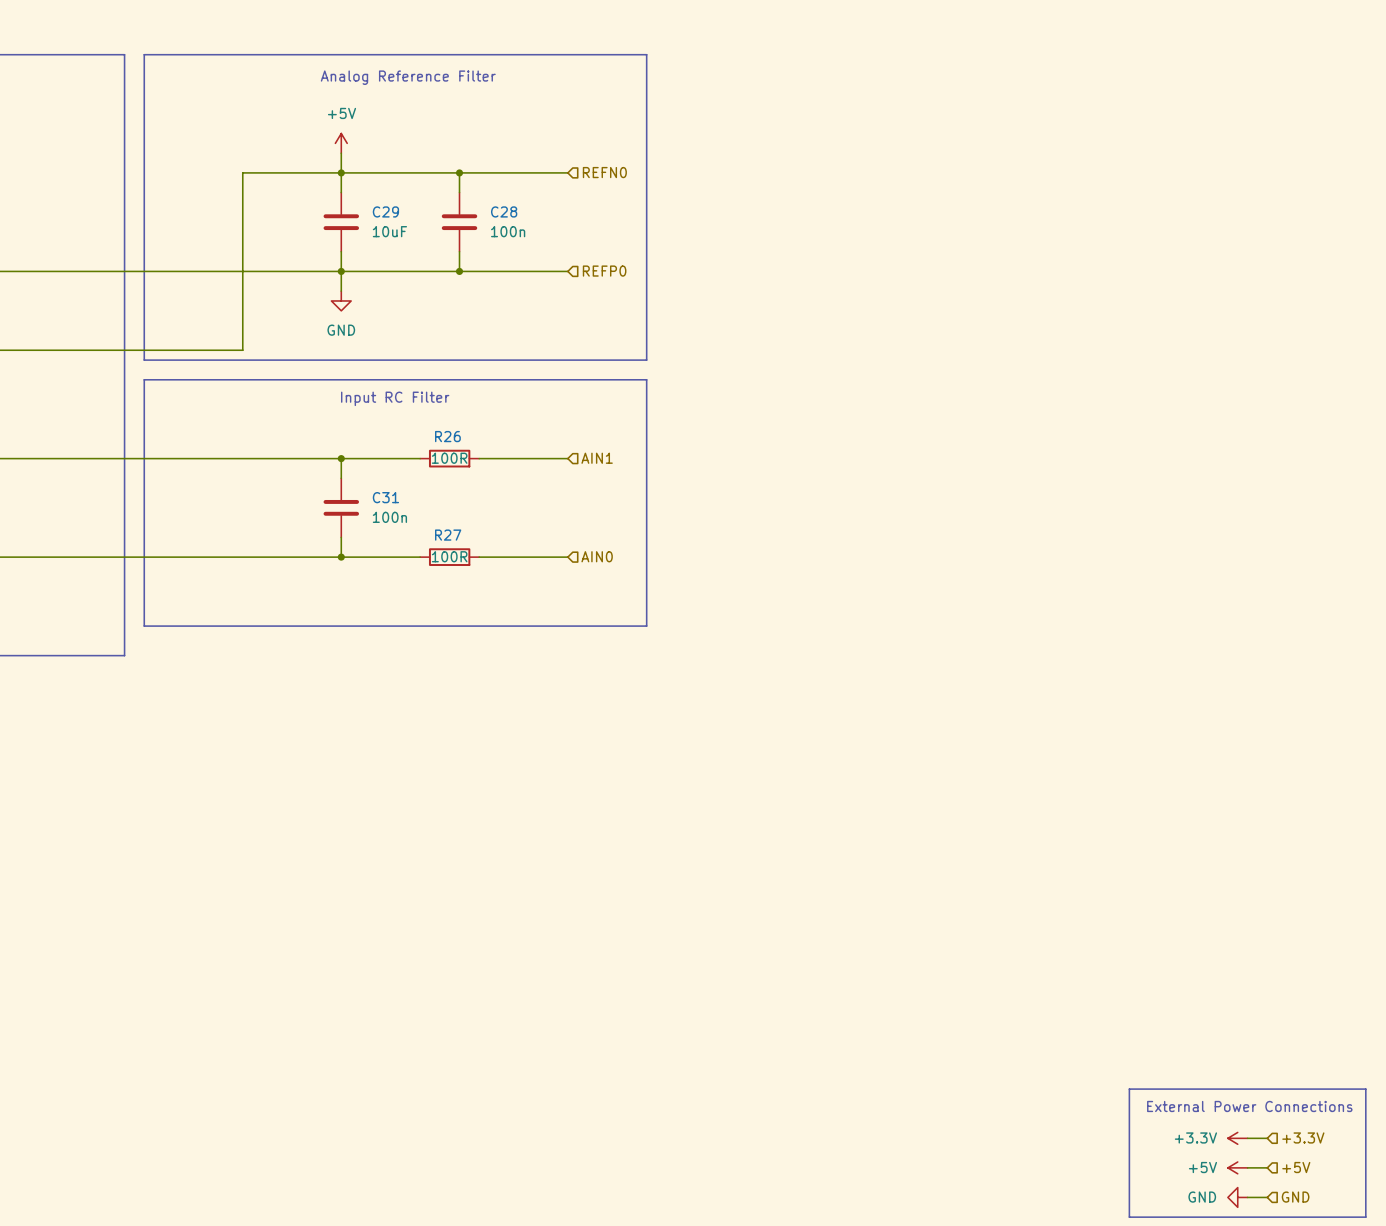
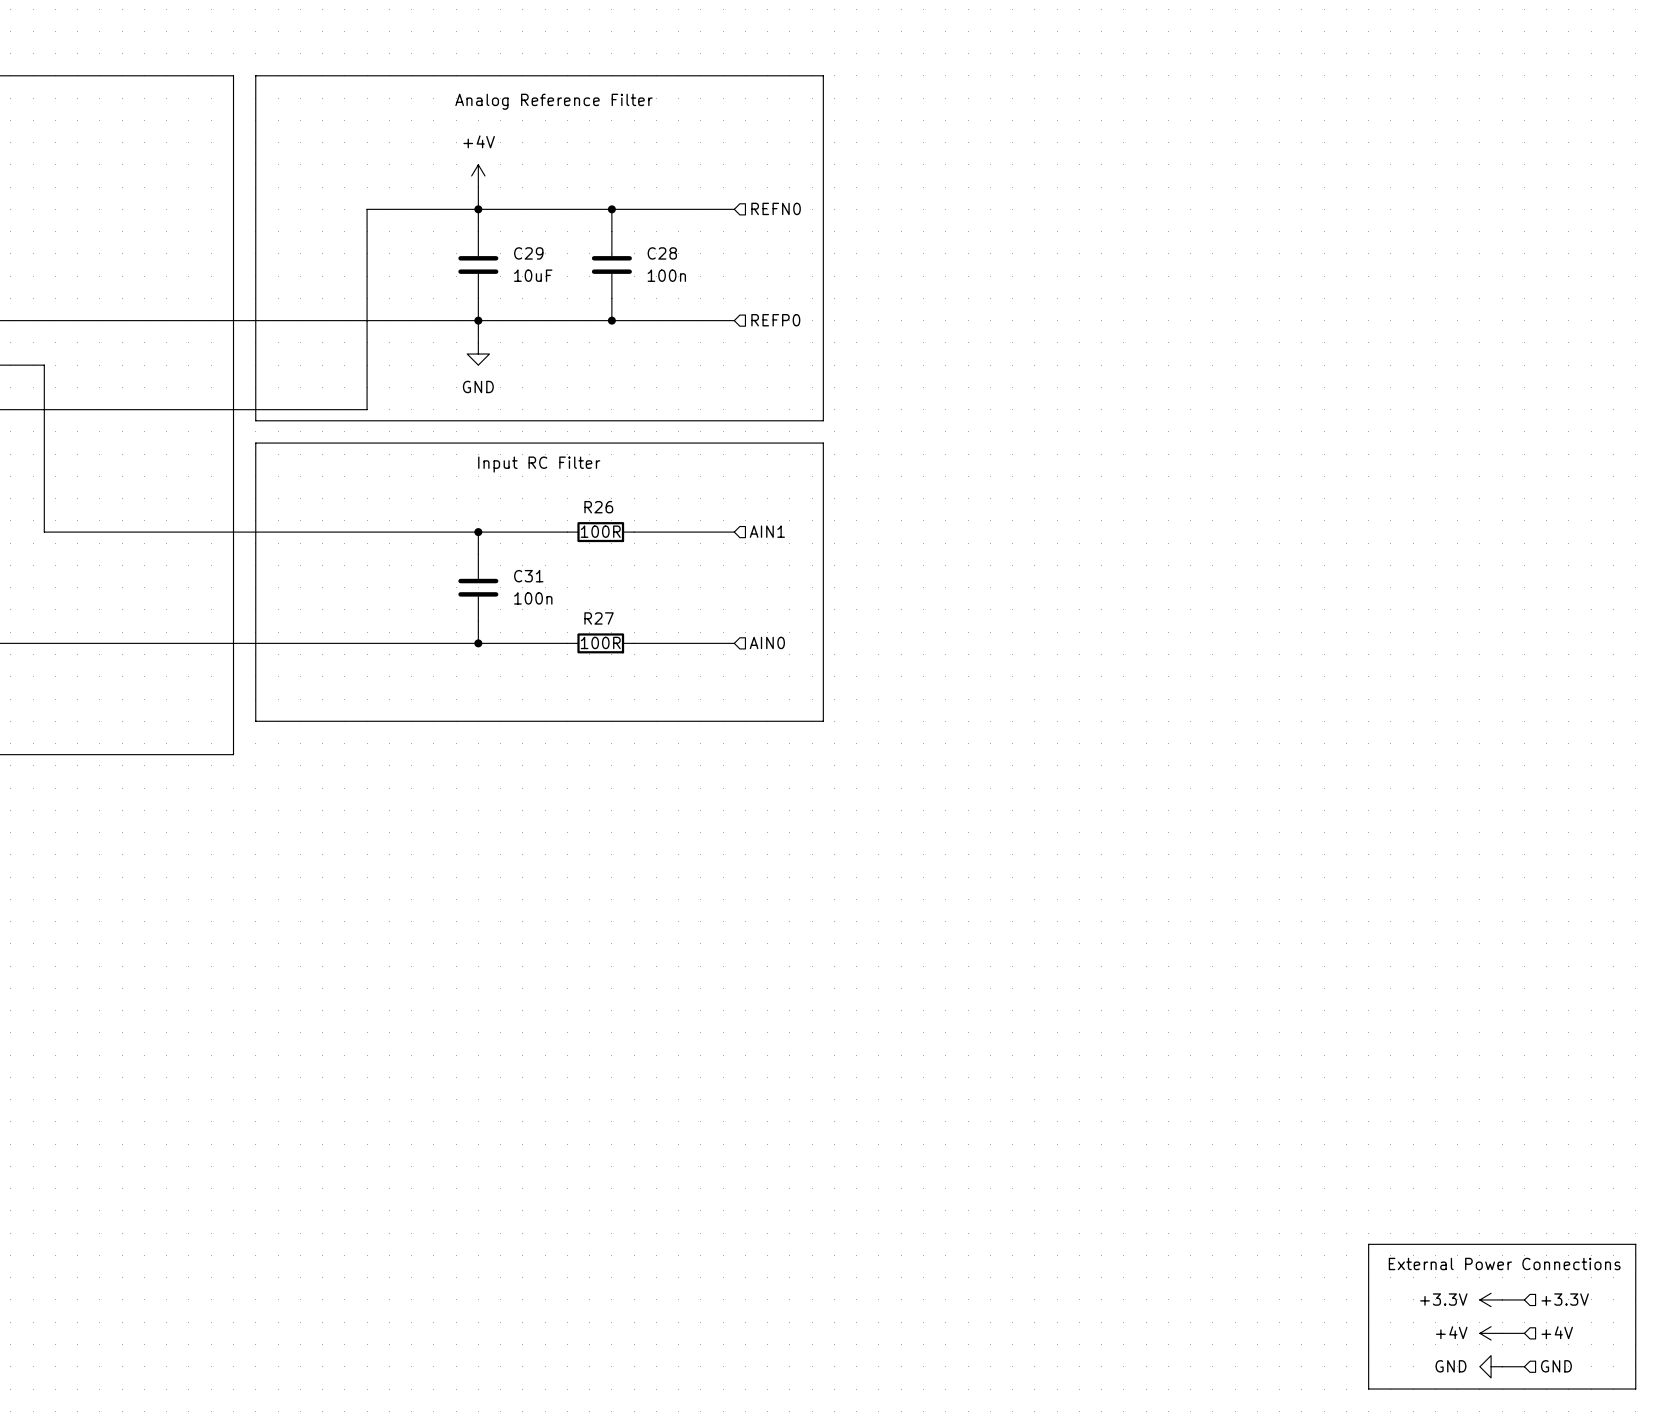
power symbol: +5V (341, 143) -> +4V (478, 175)
power symbol: +5V (1237, 1167) -> +4V (1491, 1333)
hierarchical label: +5V (1296, 1167) -> +4V (1557, 1332)

